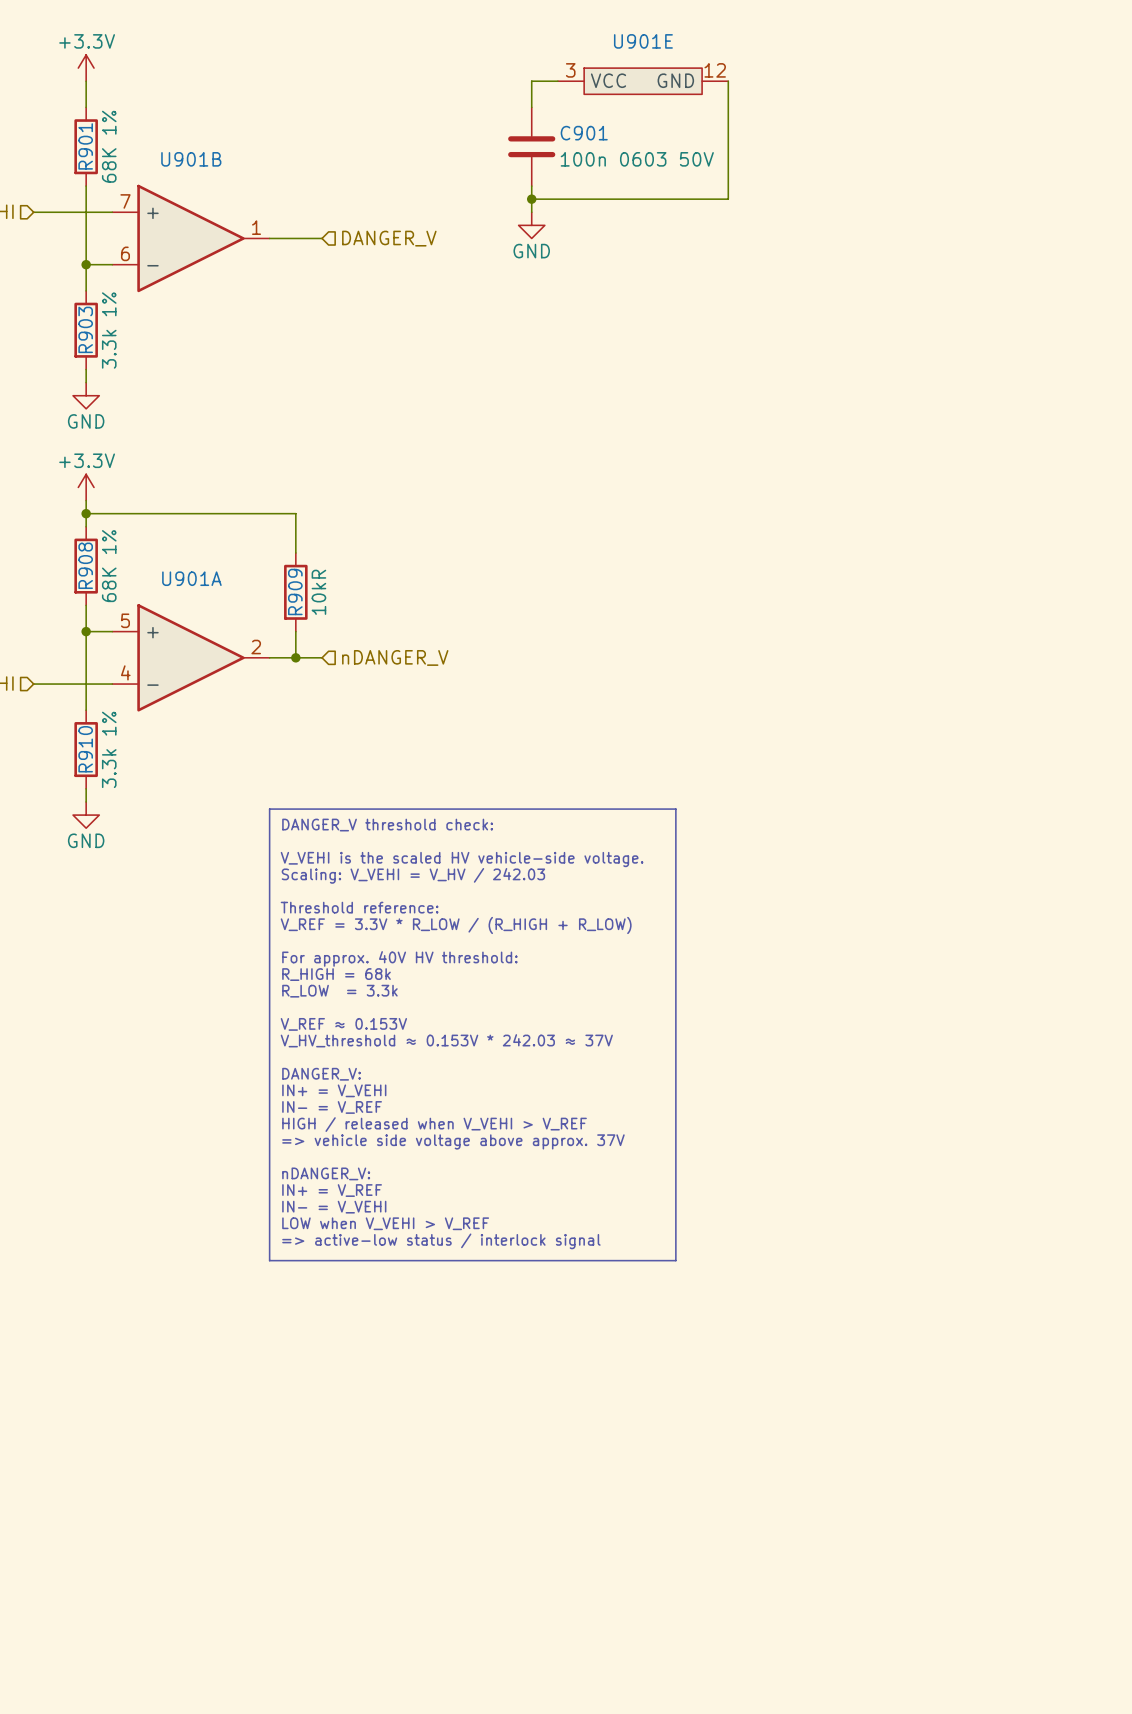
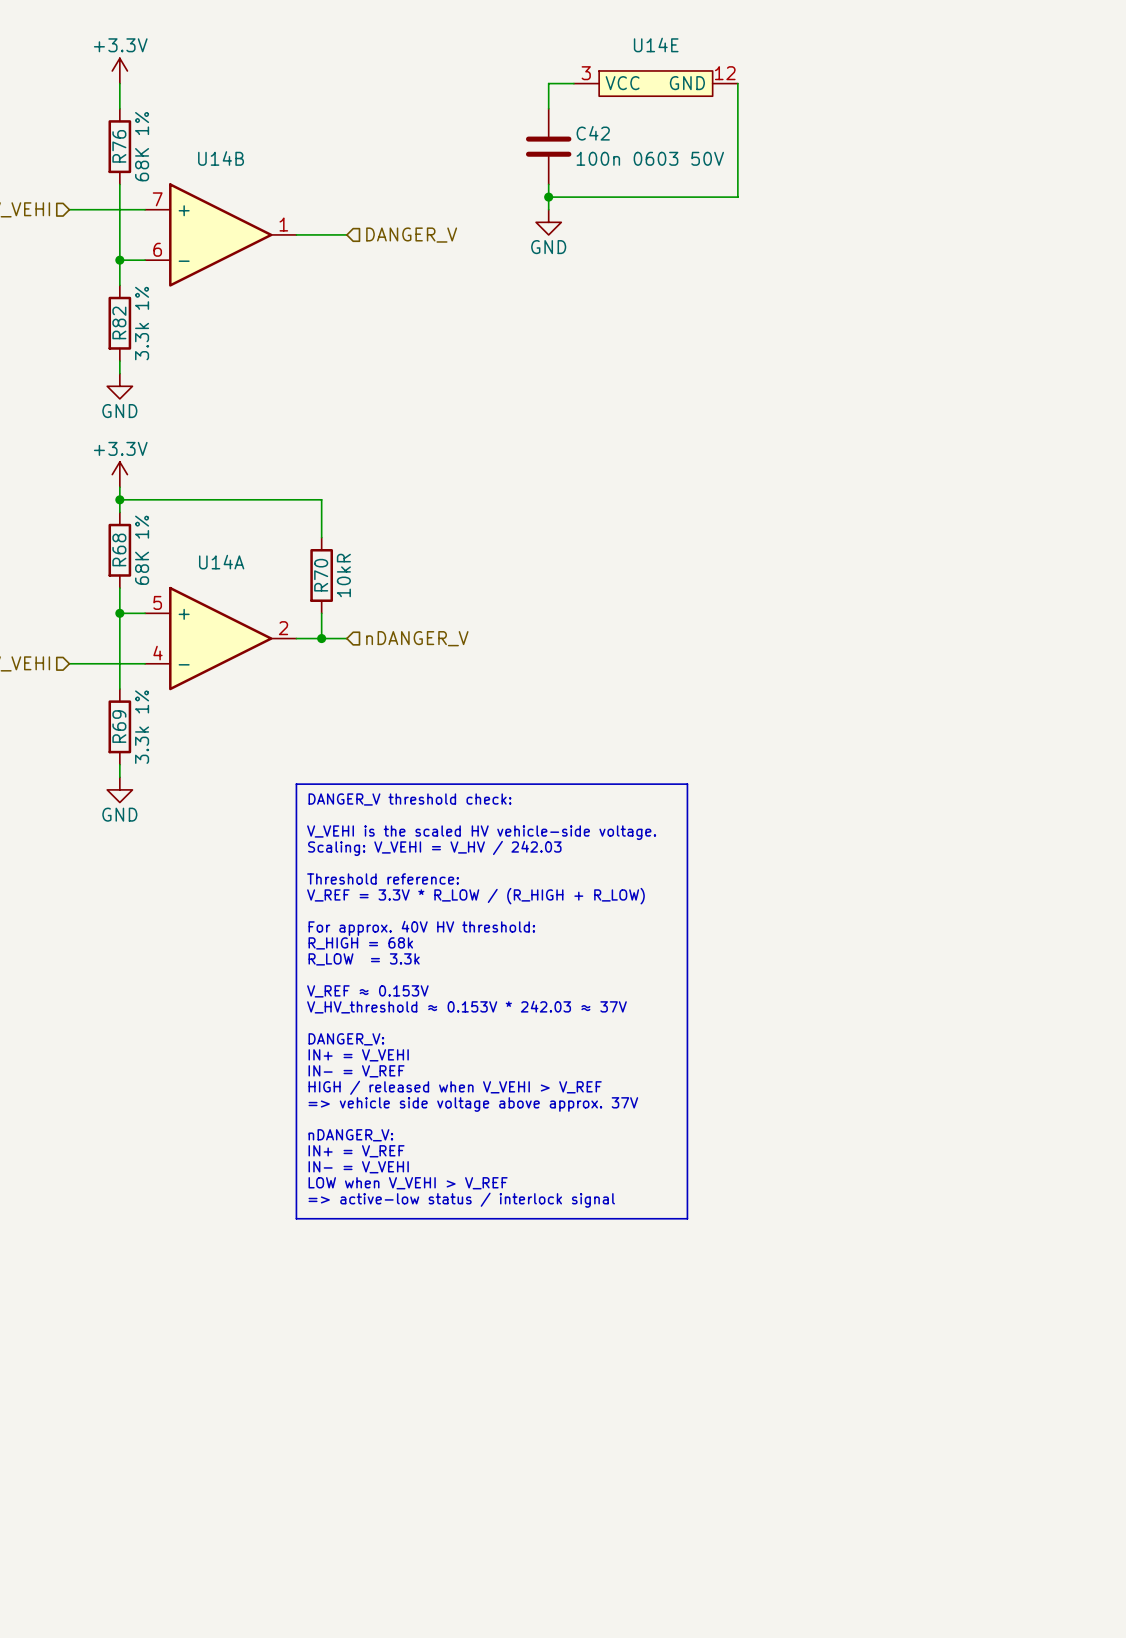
U901E name: U901E (643, 41) -> U14E (656, 44)
C901 name: C901 (584, 133) -> C42 (593, 133)
R901 name: R901 (85, 146) -> R76 (119, 146)
U901B name: U901B (191, 159) -> U14B (221, 158)
R903 name: R903 (85, 329) -> R82 (119, 322)
R908 name: R908 (85, 565) -> R68 (119, 549)
U901A name: U901A (191, 578) -> U14A (221, 562)
R909 name: R909 (295, 591) -> R70 (321, 575)
R910 name: R910 (85, 749) -> R69 (119, 726)

